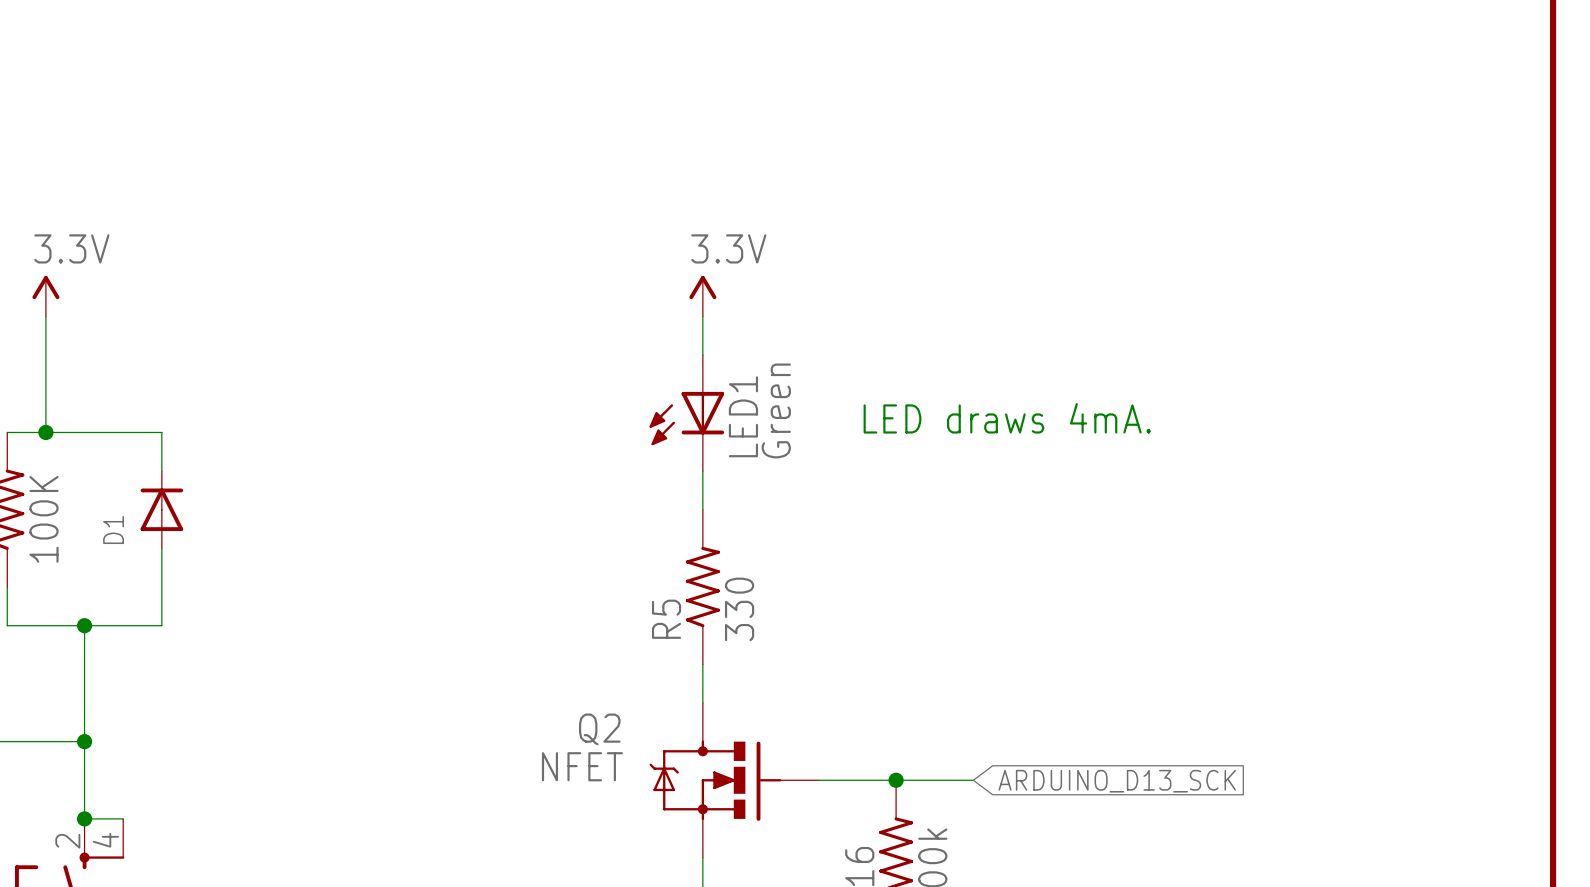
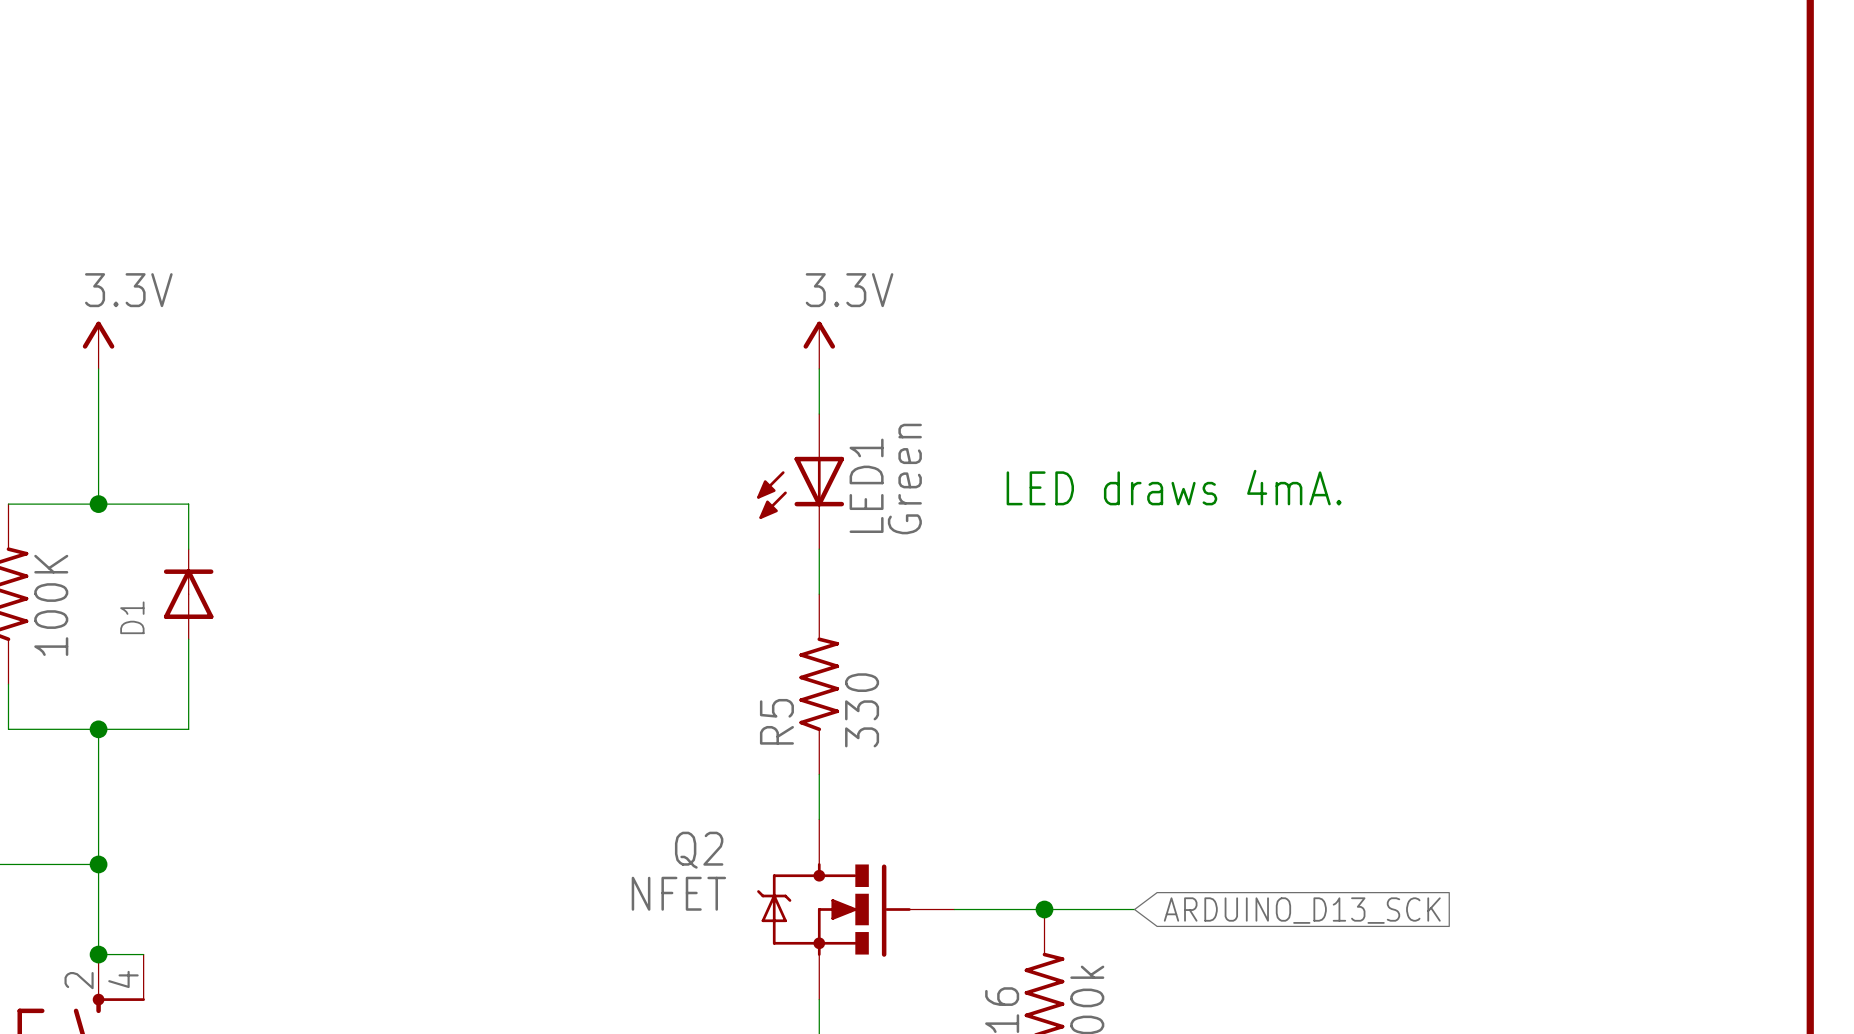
power symbol position: 3.3V (45, 296) -> 3.3V (98, 345)
wire: (45, 316) (45, 432) -> (98, 368) (98, 504)
junction position: (45, 432) -> (98, 504)

